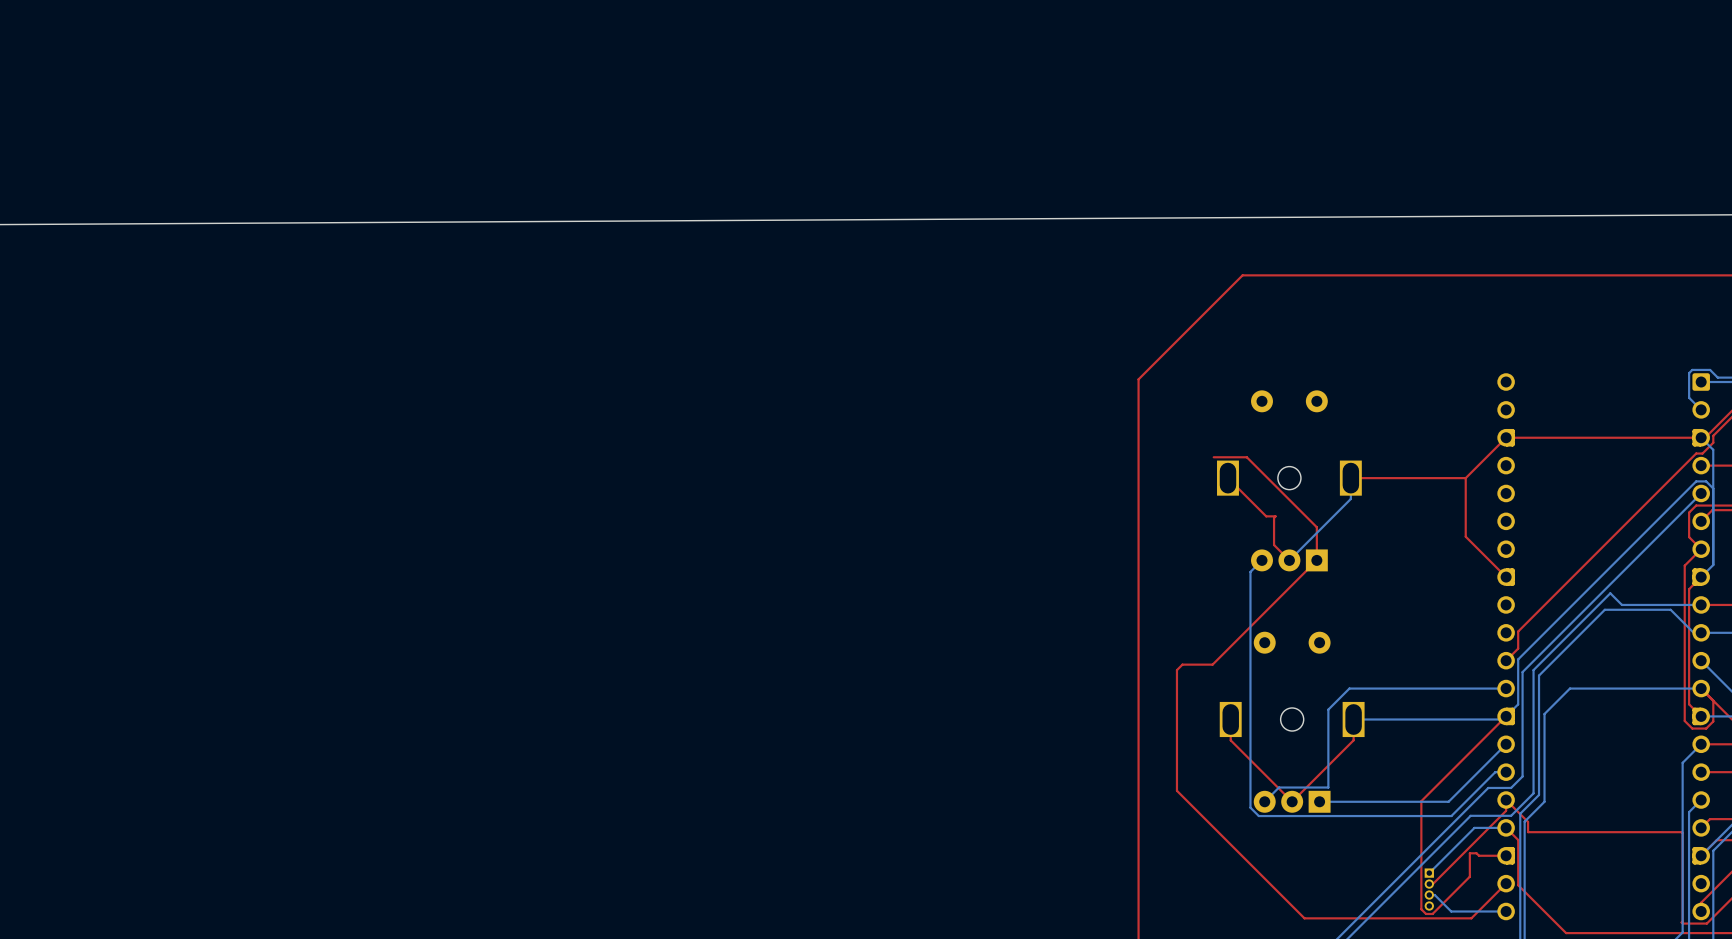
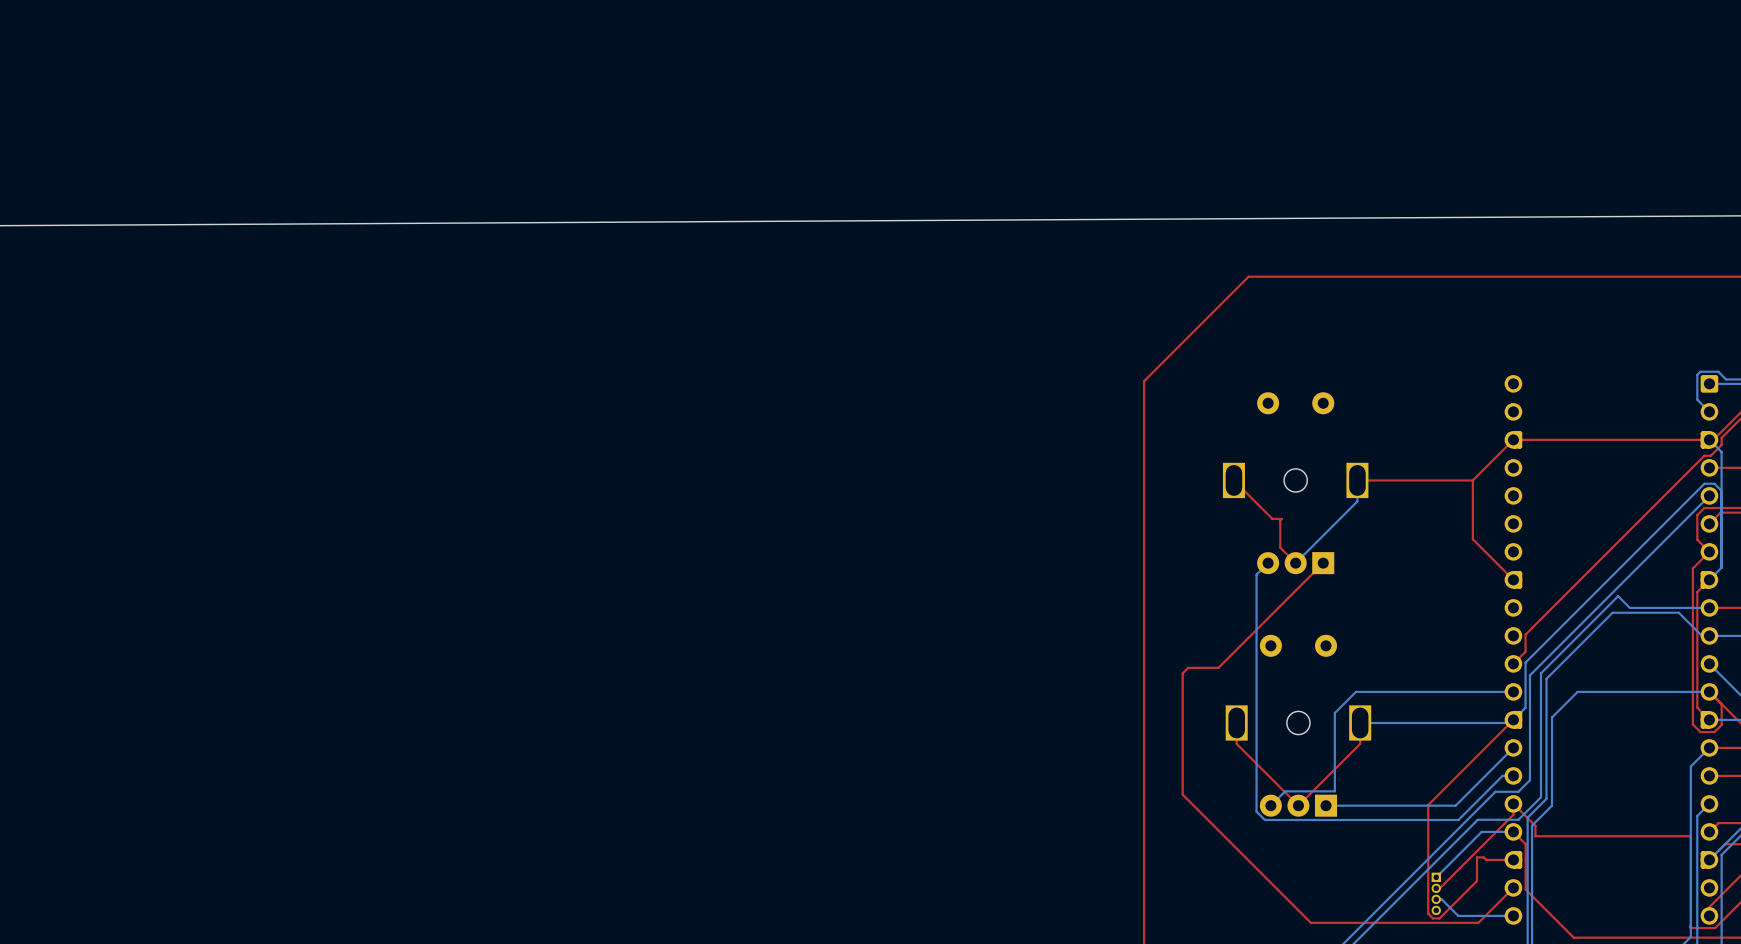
top track: (1213, 457) (1246, 457) (1316, 527) (1316, 560) -> none

